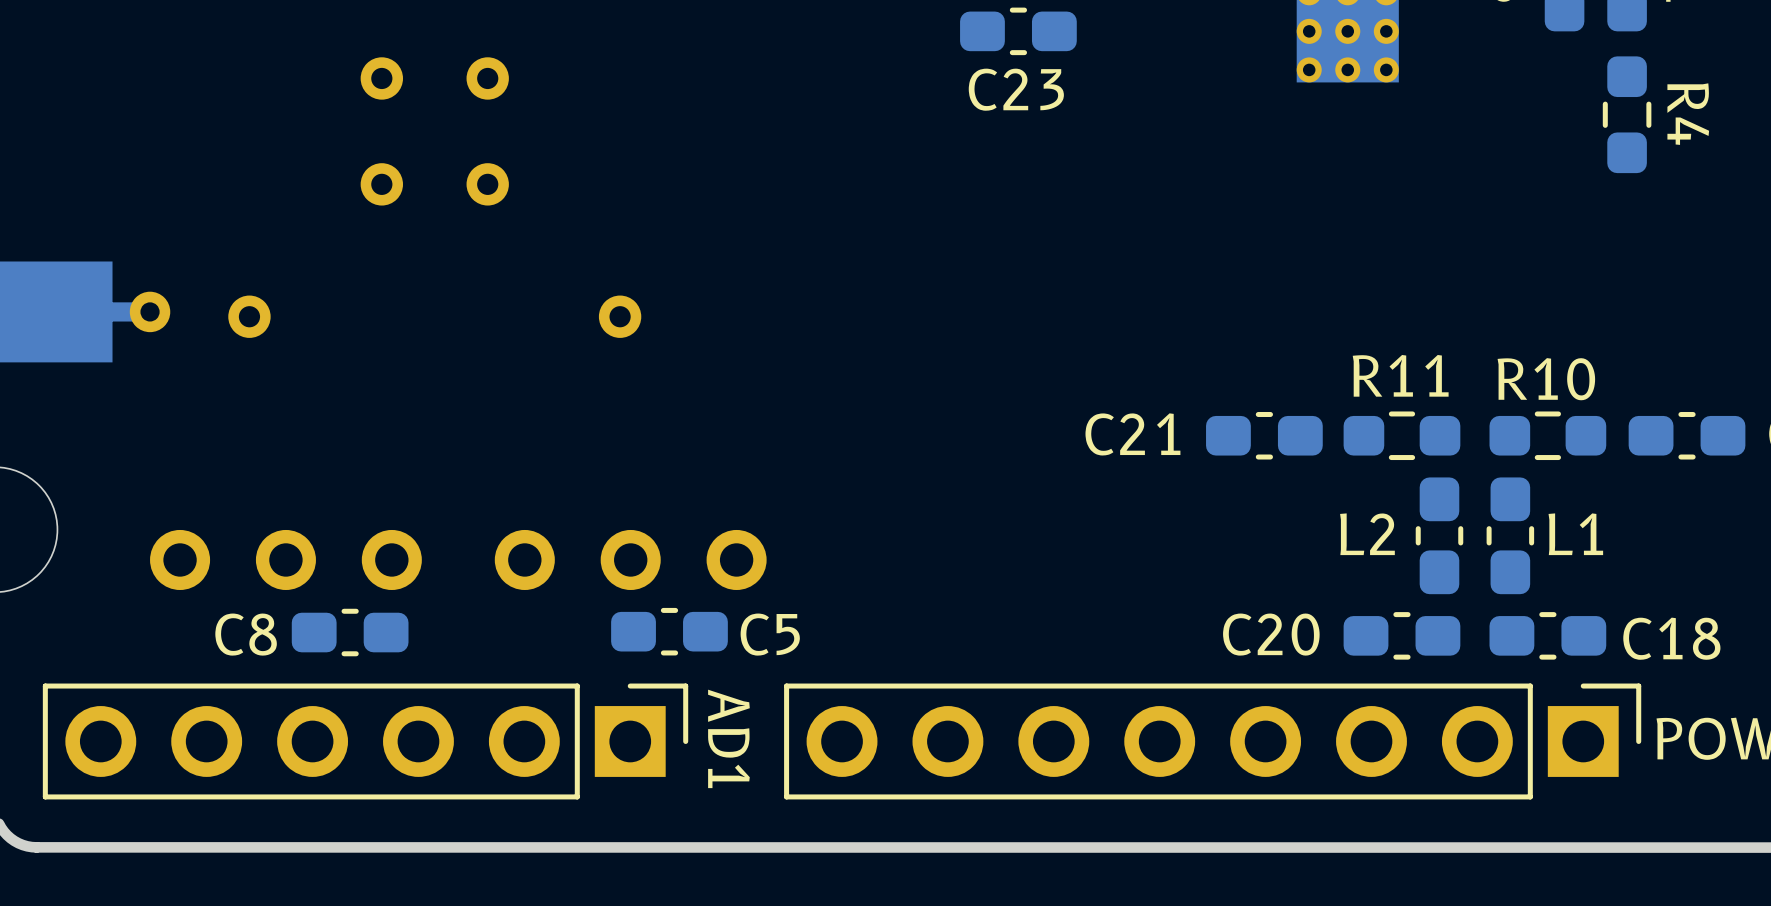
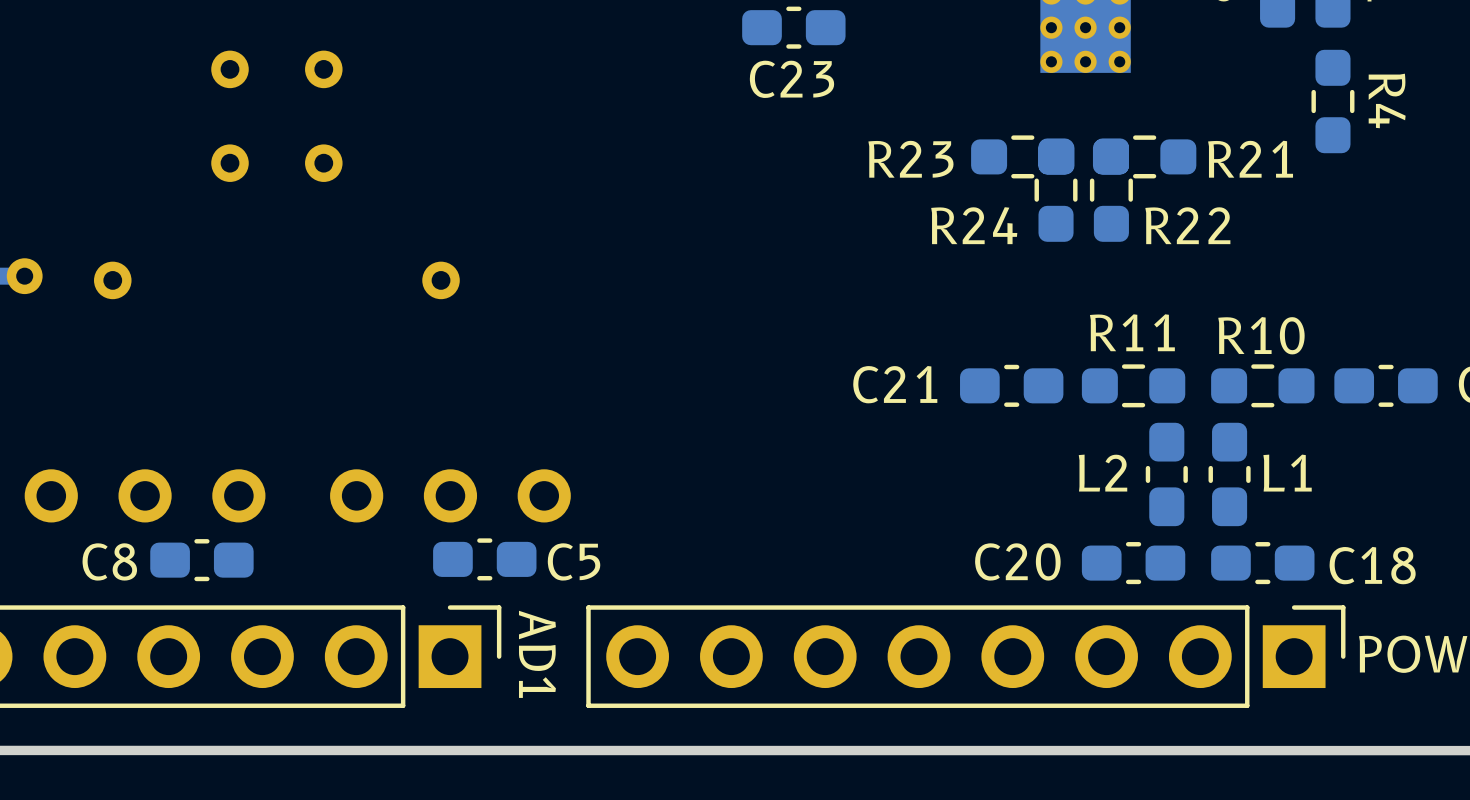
R23: none -> (1022, 156)
R21: none -> (1144, 156)
R24: none -> (1056, 190)
R22: none -> (1111, 190)

